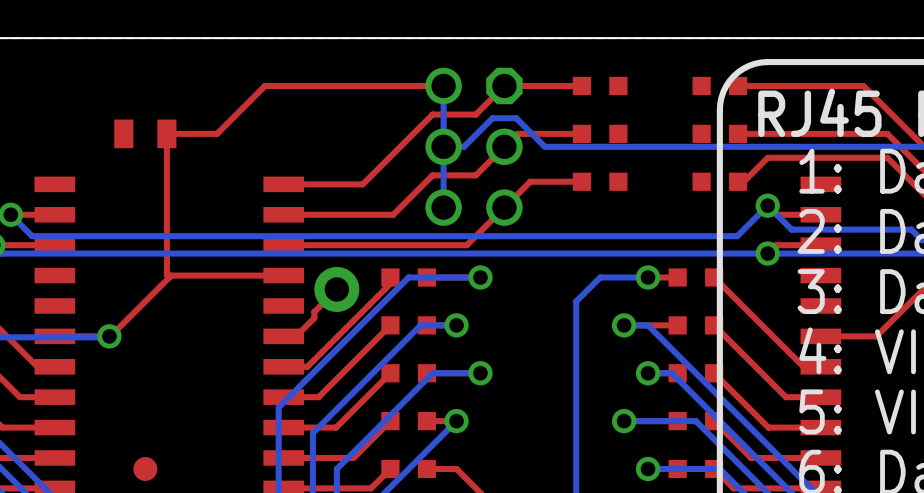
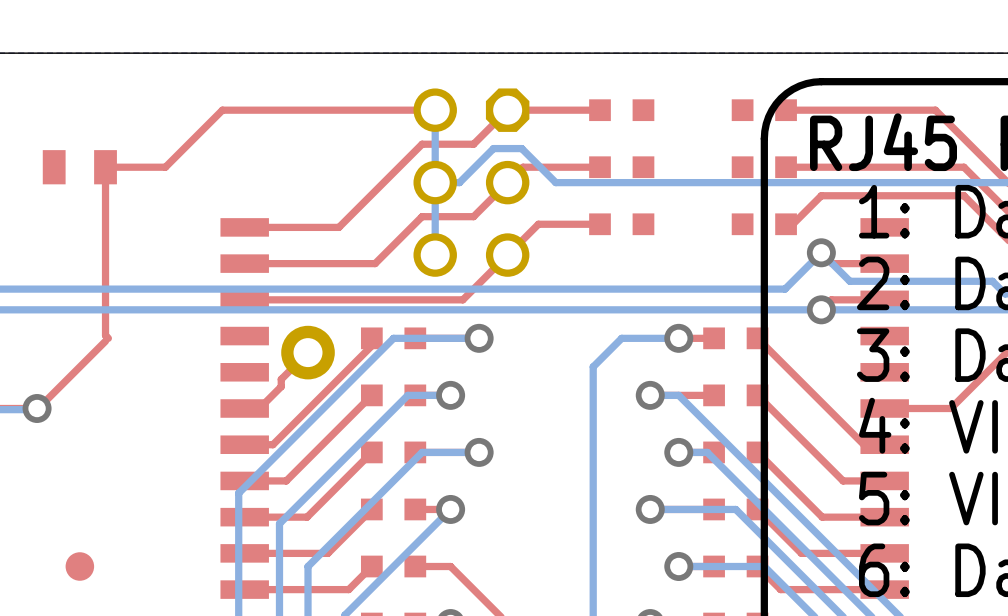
top track: (283, 275) (171, 275) (166, 279) -> none

